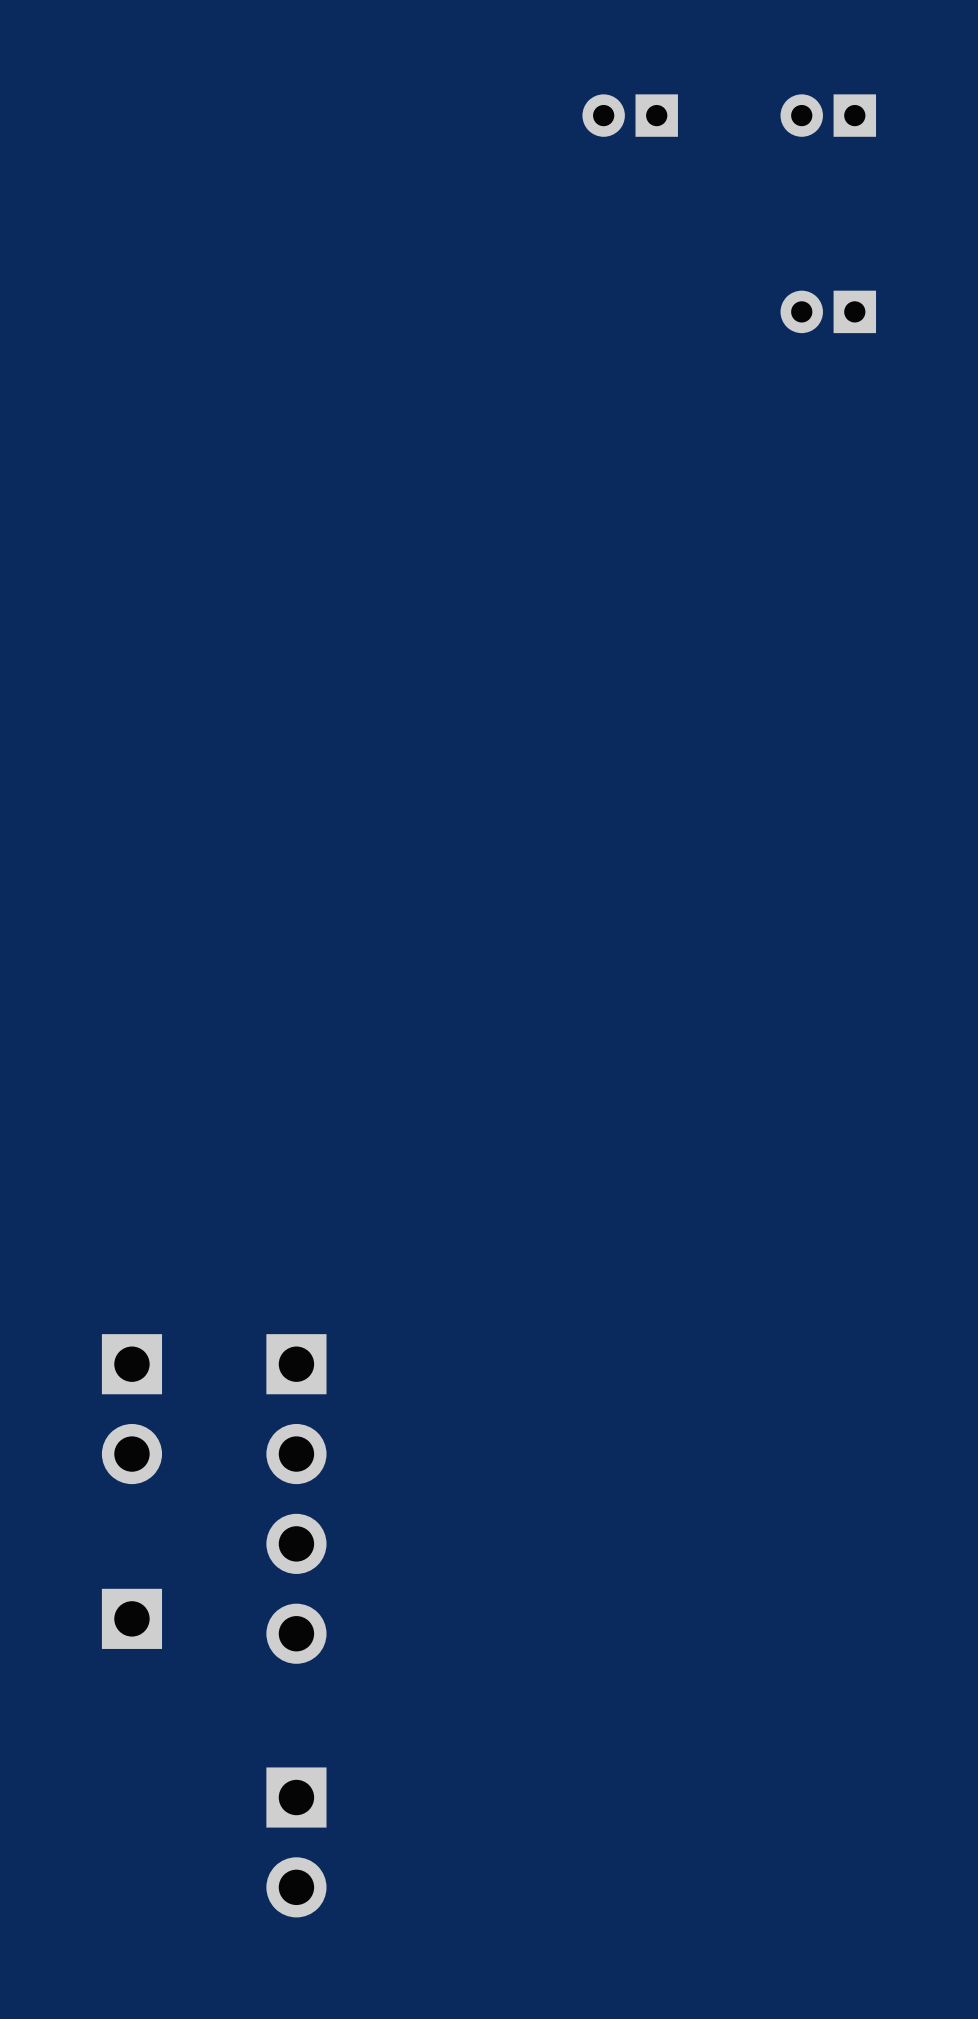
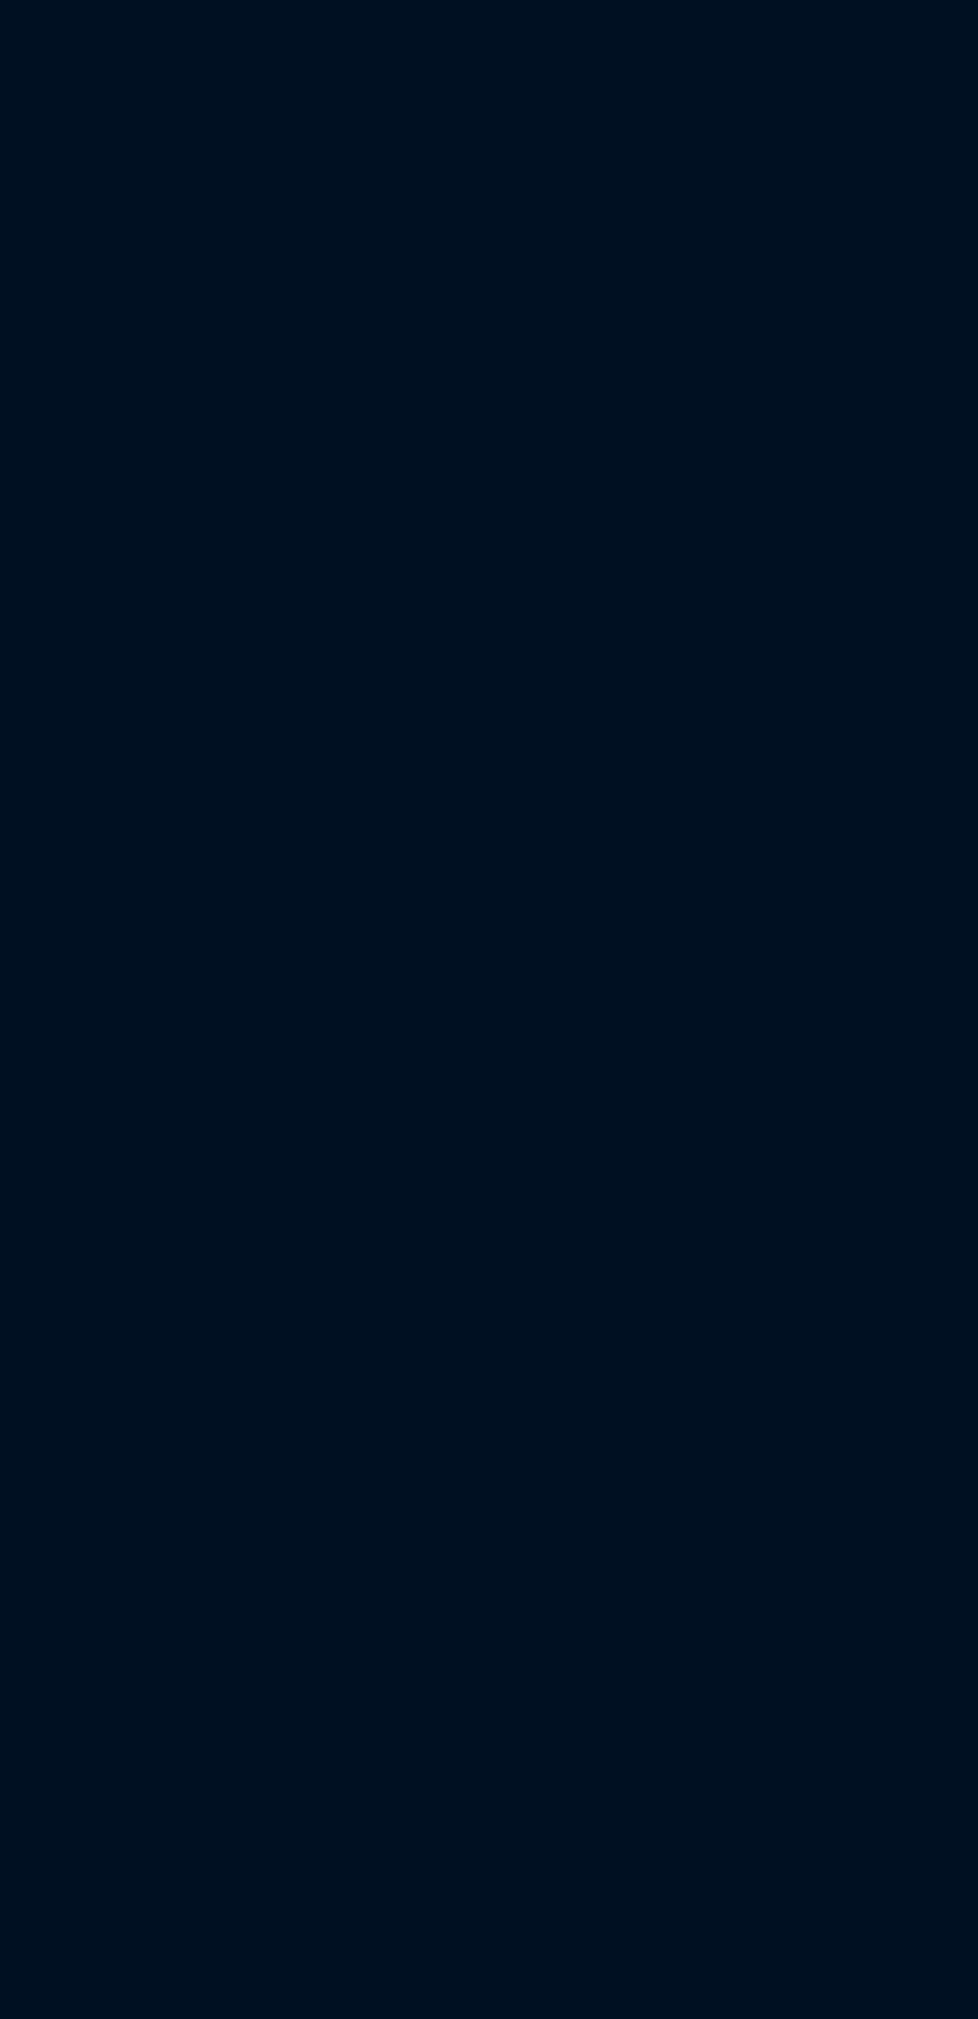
part: (630, 115) -> none
part: (828, 115) -> none
part: (828, 311) -> none
part: (131, 1409) -> none
part: (296, 1498) -> none
part: (131, 1618) -> none
part: (296, 1842) -> none

